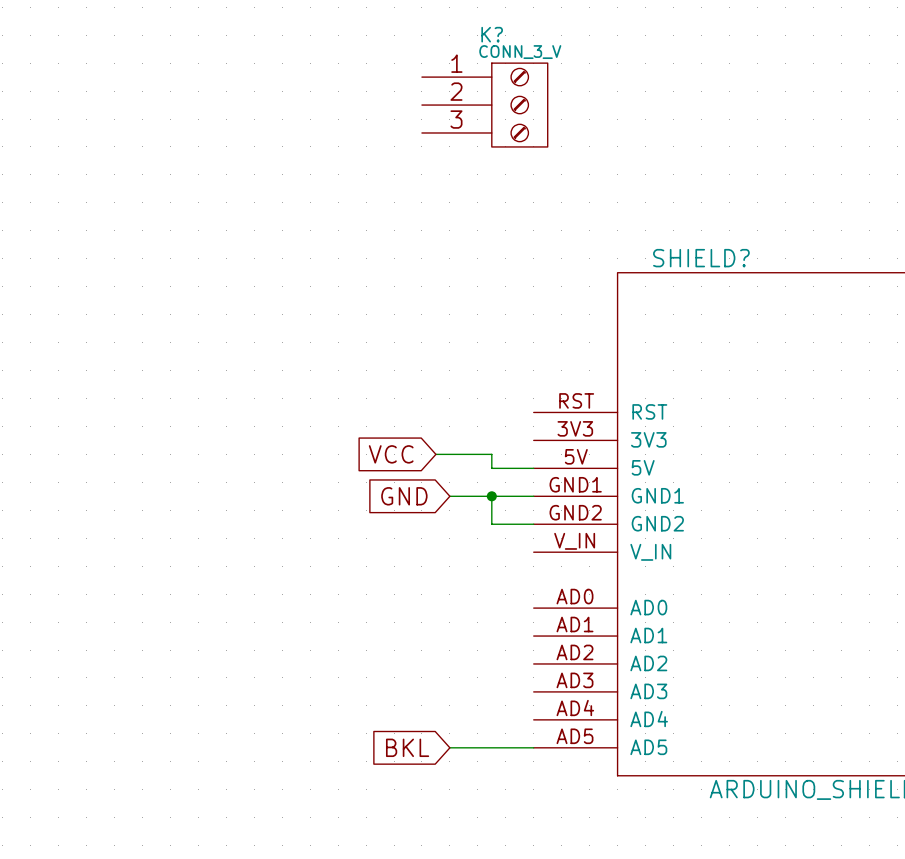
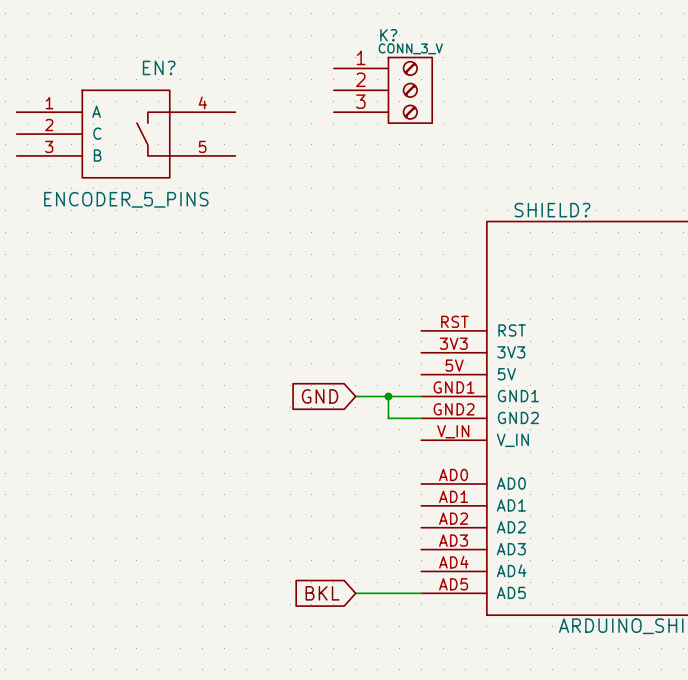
EN?: none -> ENCODER_5_PINS (126, 134)
global label: VCC (391, 454) -> none
wire: (435, 454) (491, 454) (491, 468) (533, 468) -> none

